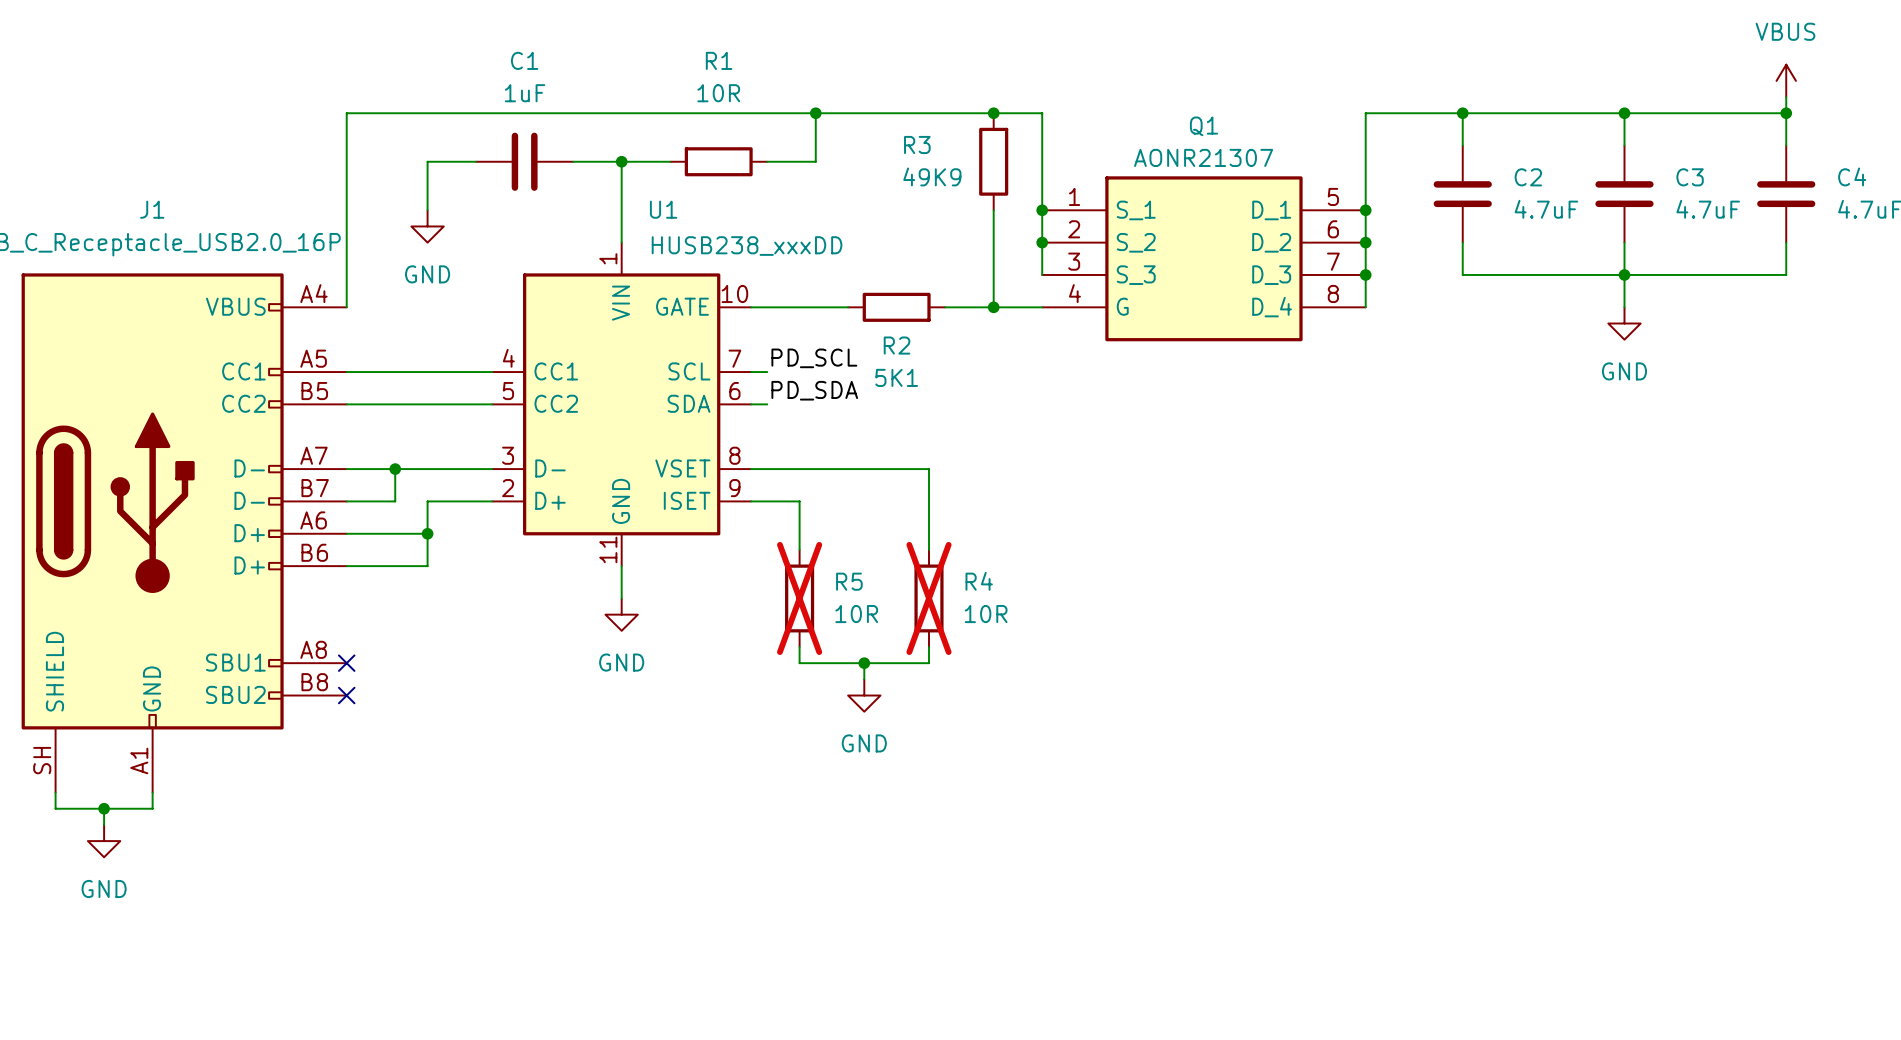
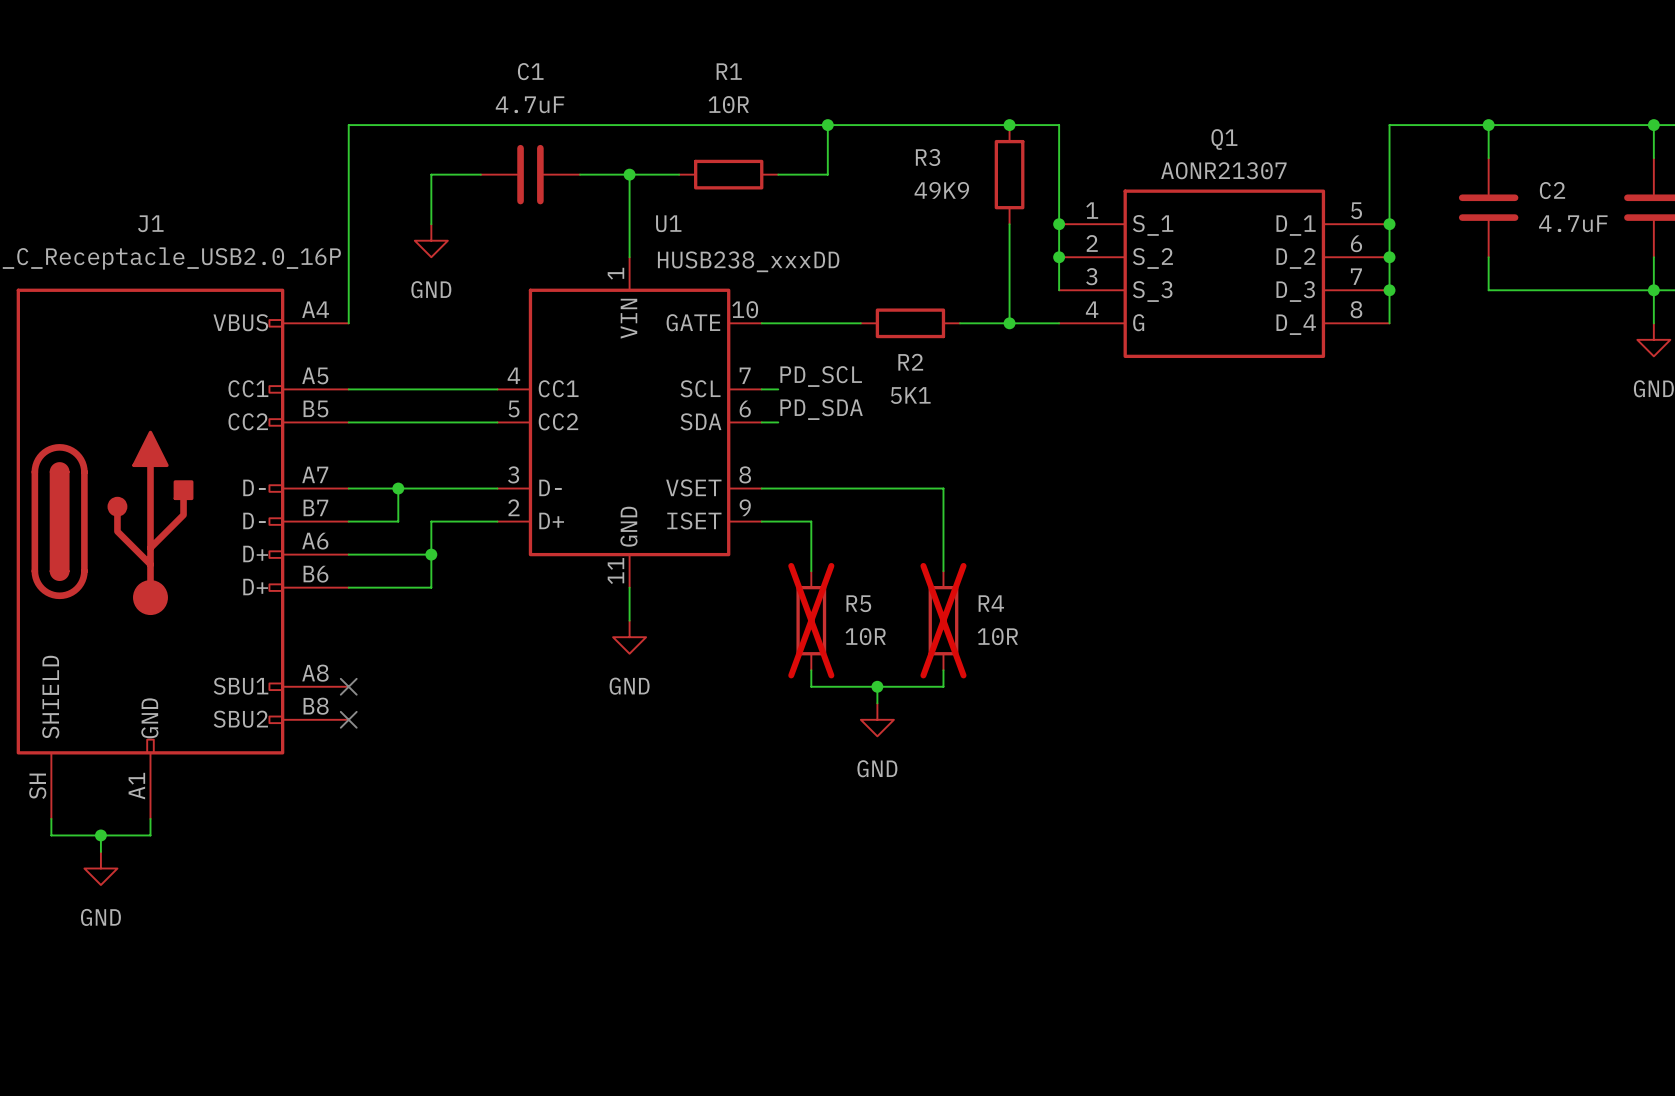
C1 value: 1uF (525, 93) -> 4.7uF (530, 104)

